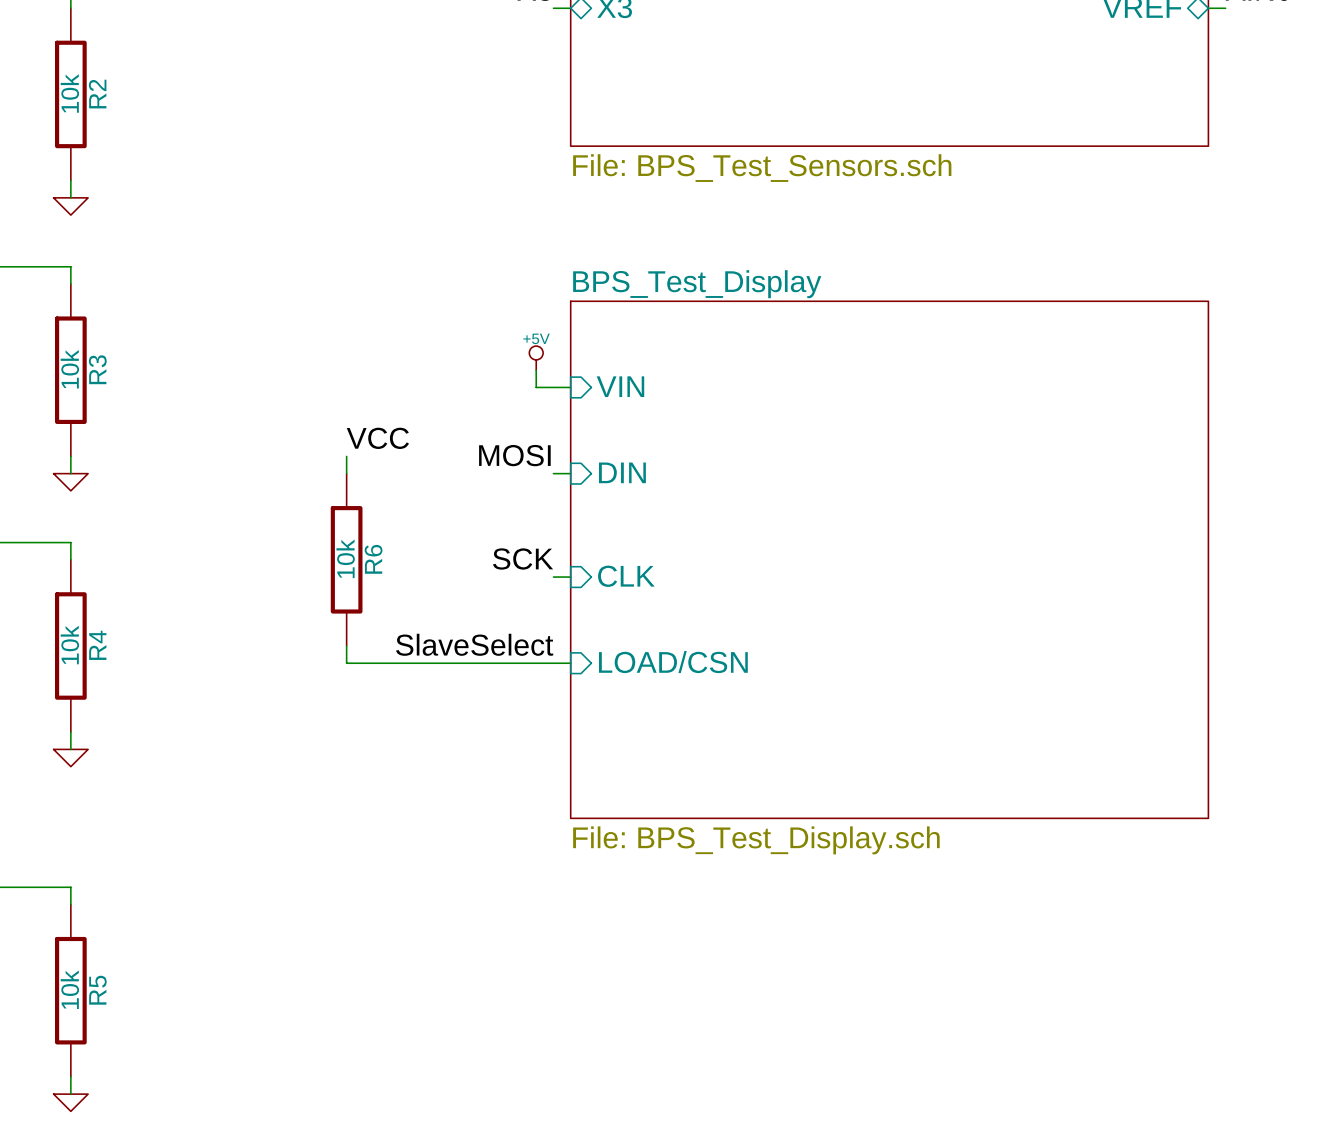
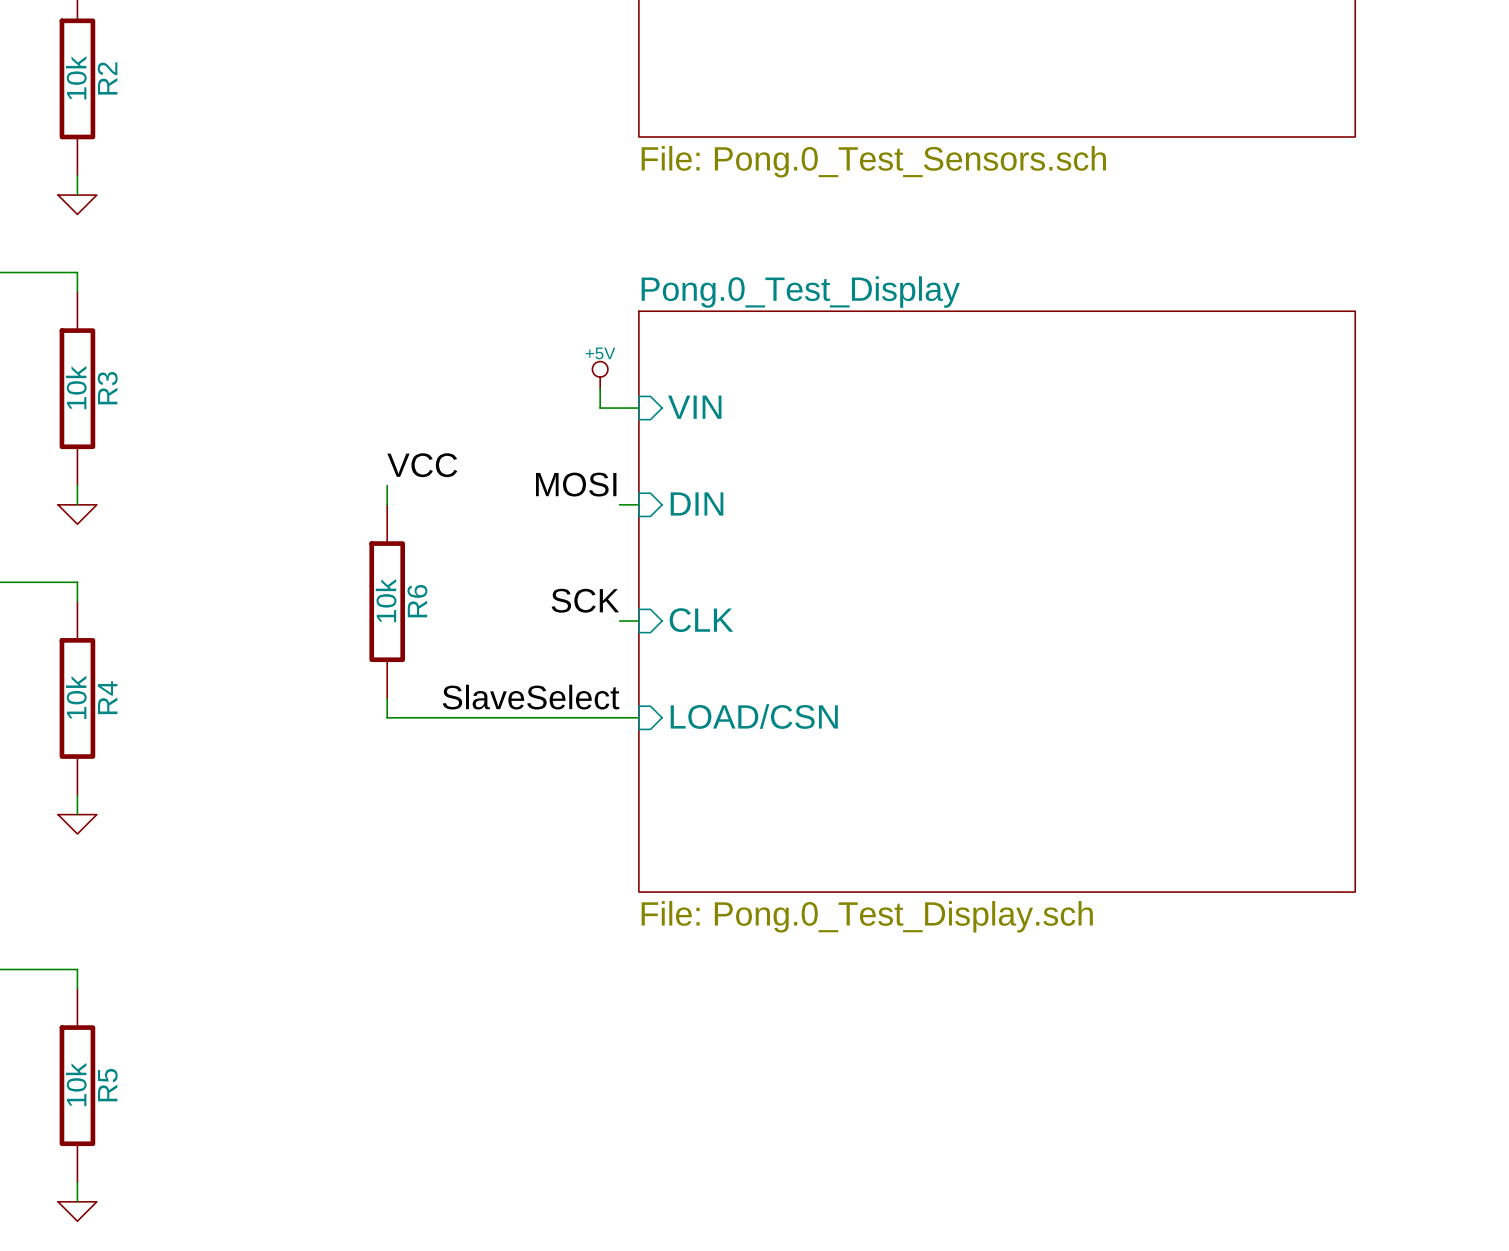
sheet value: File: BPS_Test_Sensors.sch (762, 168) -> File: Pong.0_Test_Sensors.sch (873, 161)
sheet BPS_Test_Display name: BPS_Test_Display (697, 284) -> Pong.0_Test_Display (800, 292)
sheet BPS_Test_Display value: File: BPS_Test_Display.sch (756, 840) -> File: Pong.0_Test_Display.sch (867, 916)

